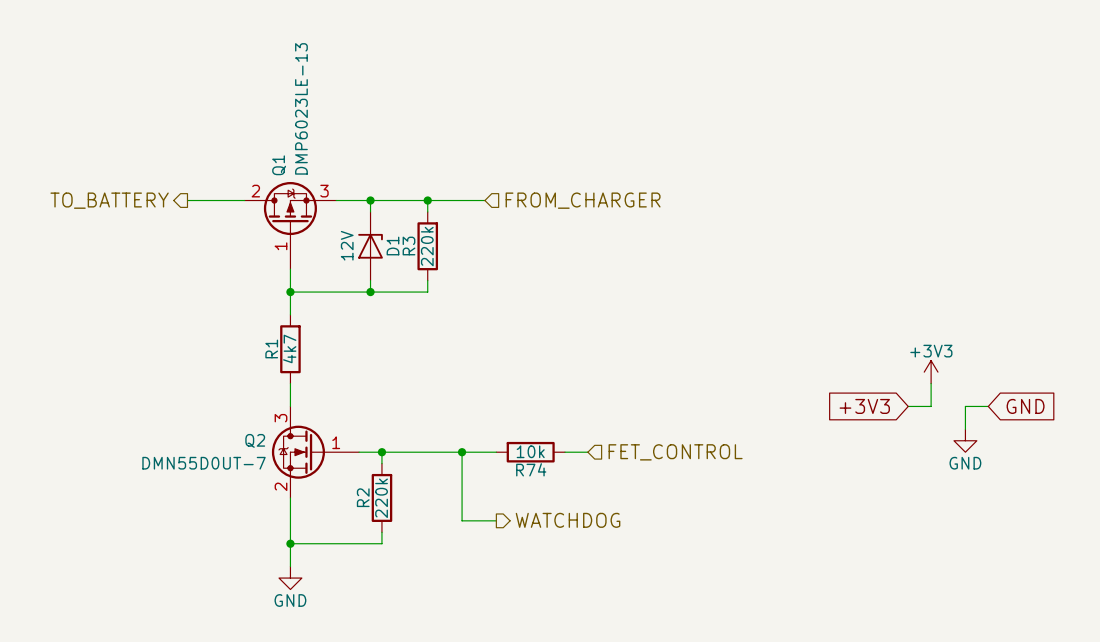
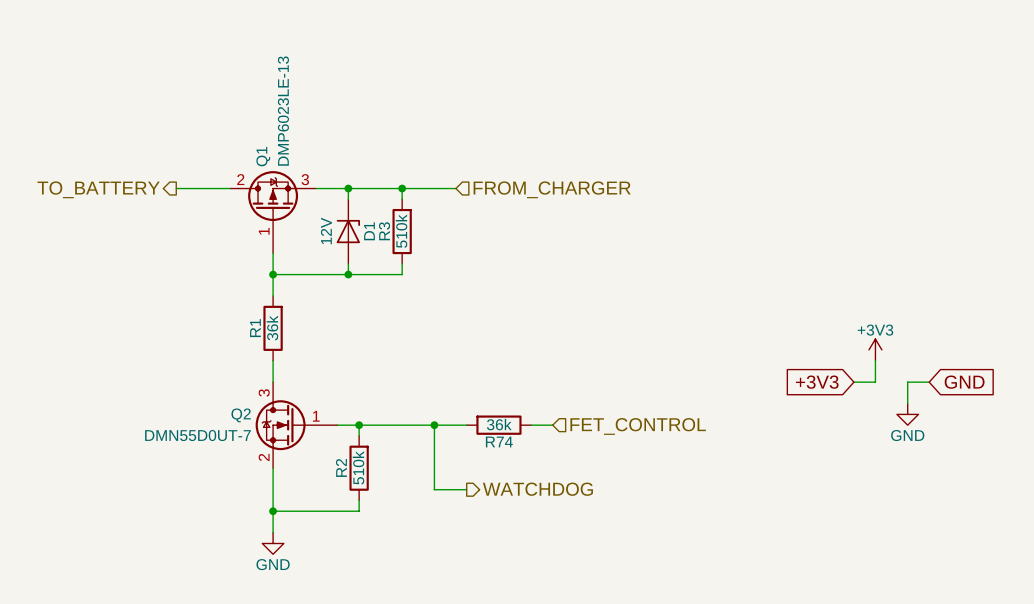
R3 value: 220k (427, 246) -> 510k (401, 231)
R1 value: 4k7 (289, 348) -> 36k (272, 328)
R74 value: 10k (530, 451) -> 36k (499, 424)
R2 value: 220k (381, 498) -> 510k (358, 467)

